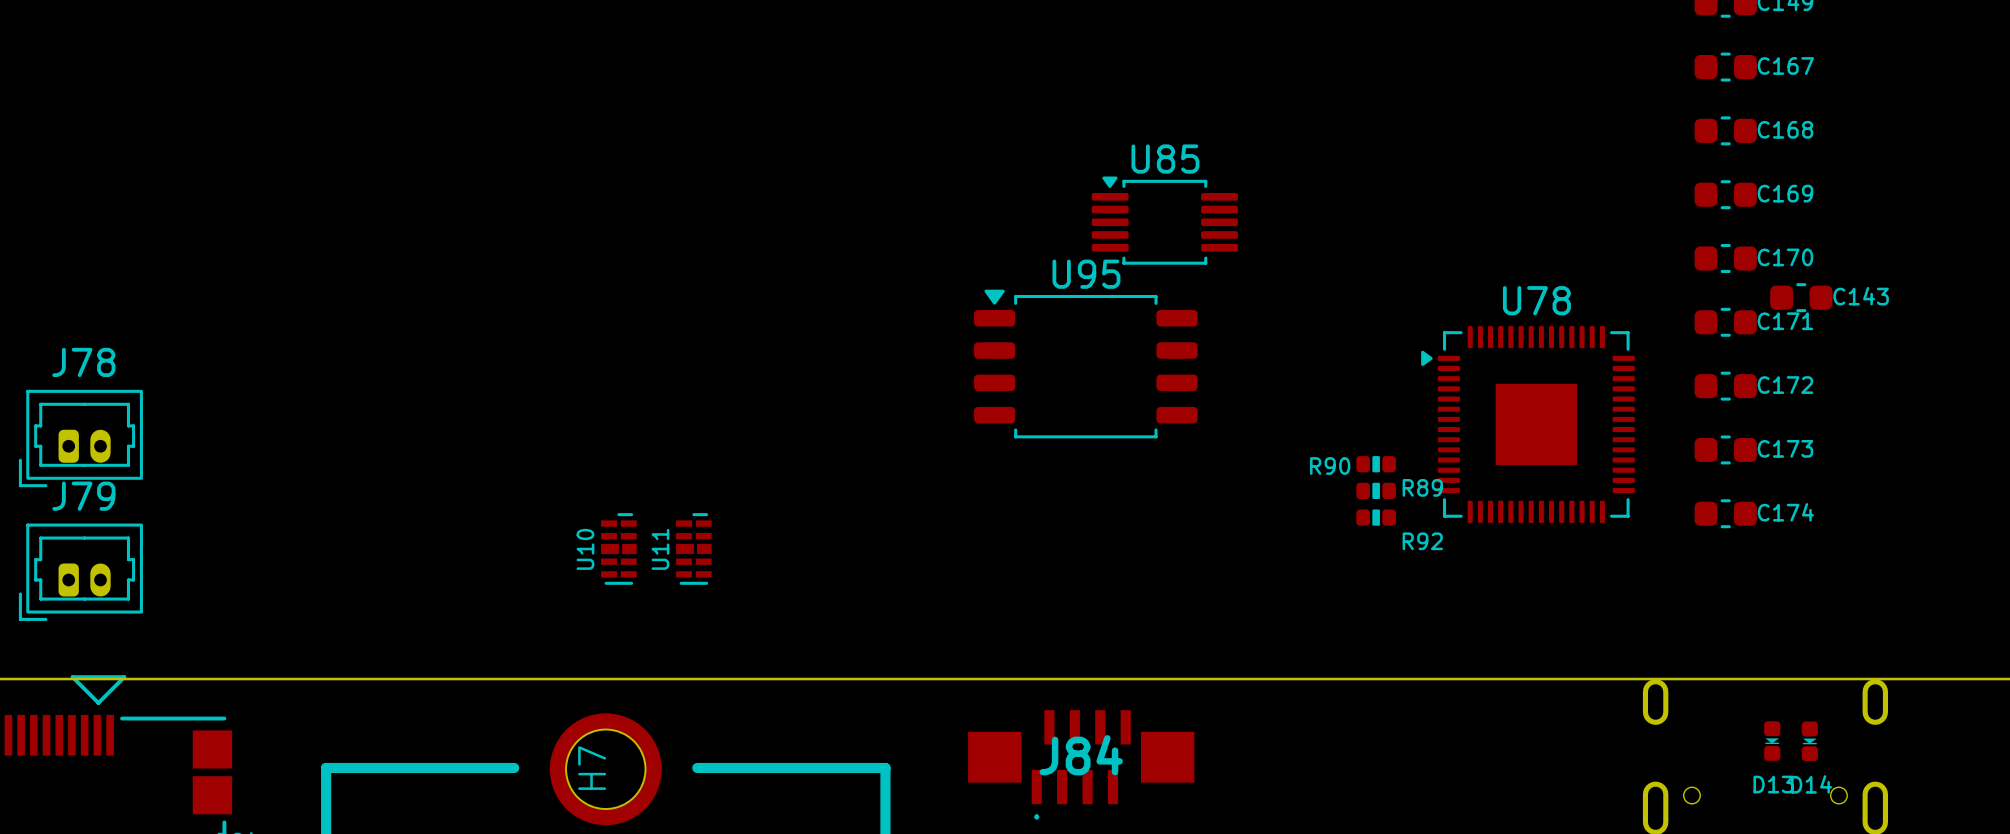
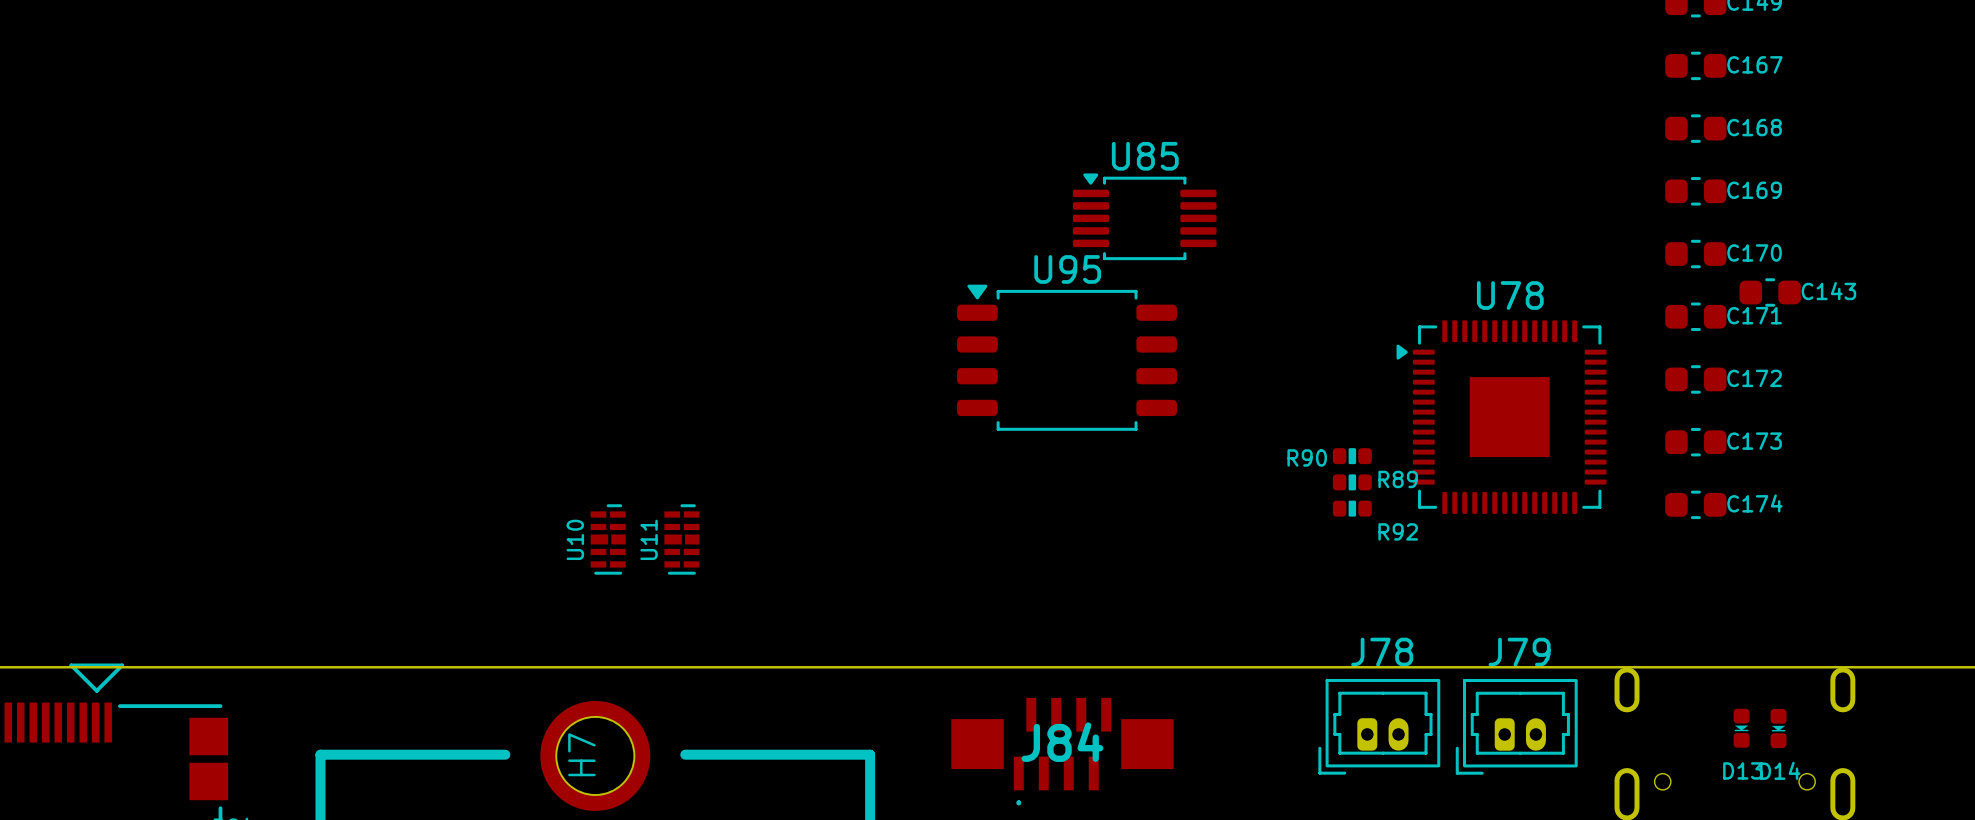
J78 position: (80, 438) -> (1379, 726)
J79 position: (80, 572) -> (1516, 726)

